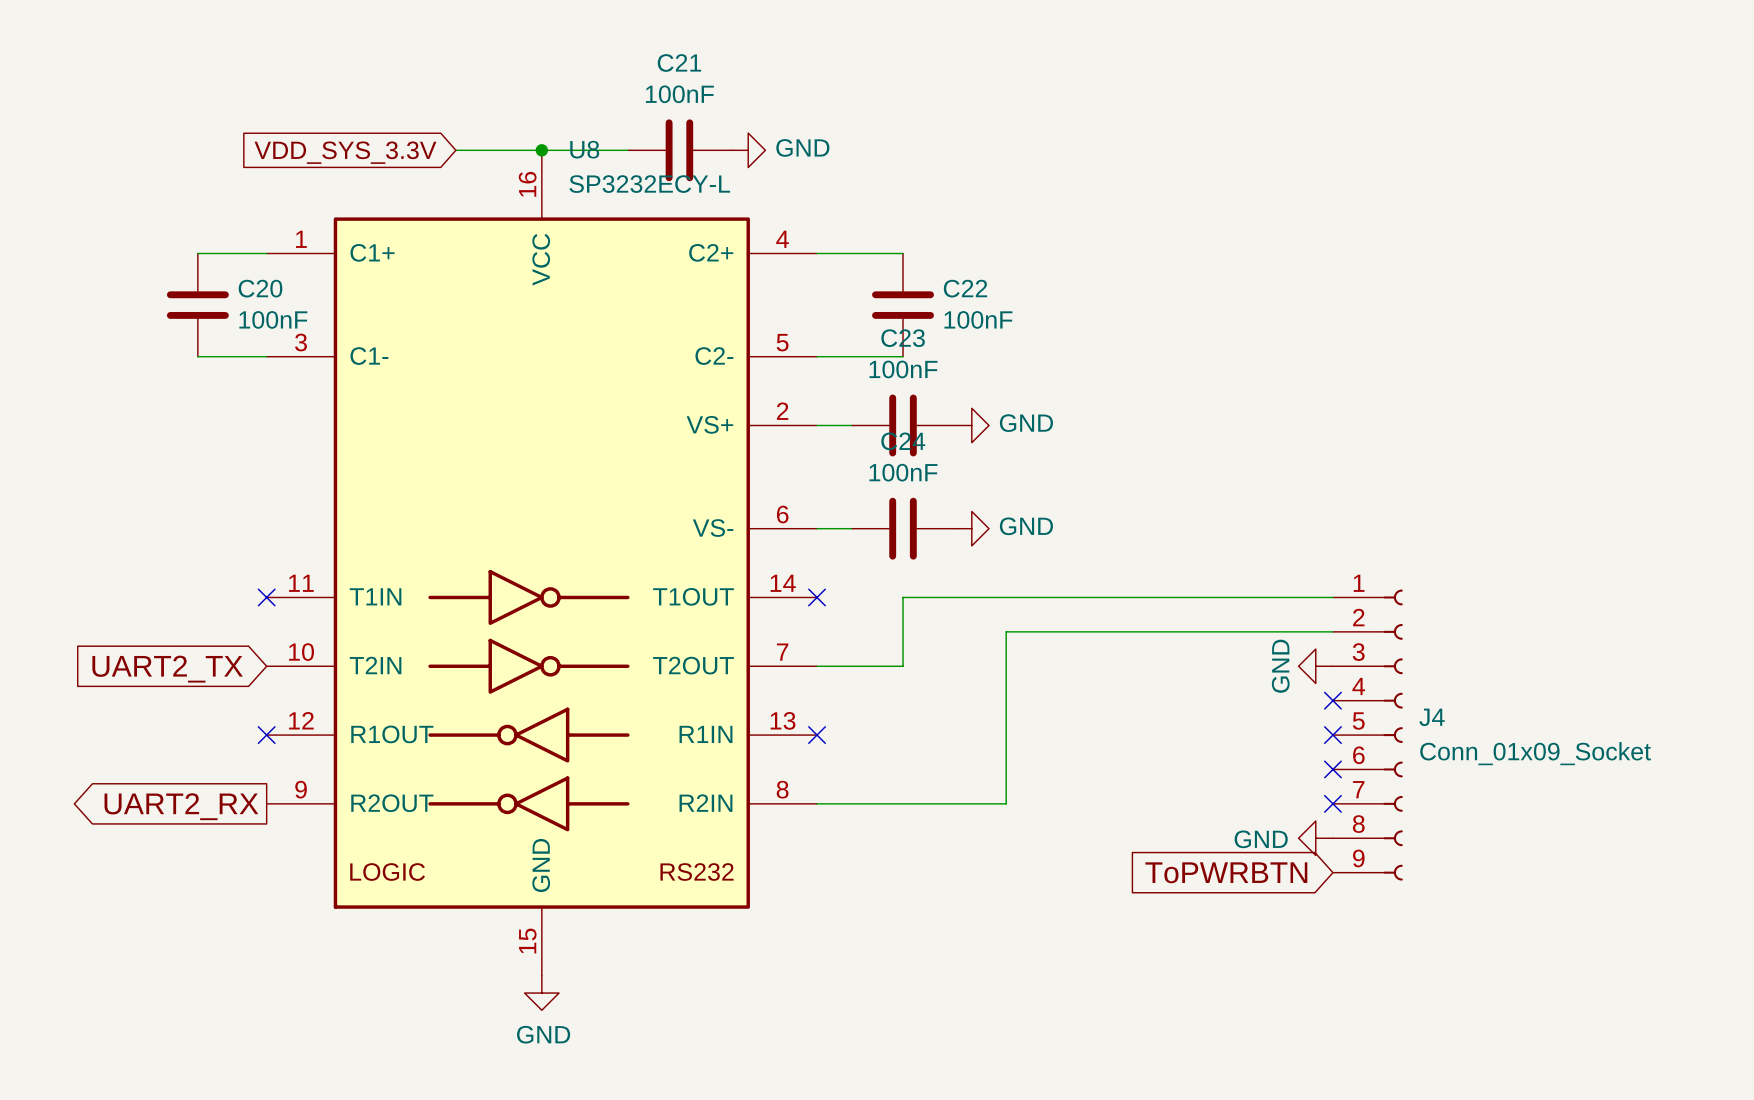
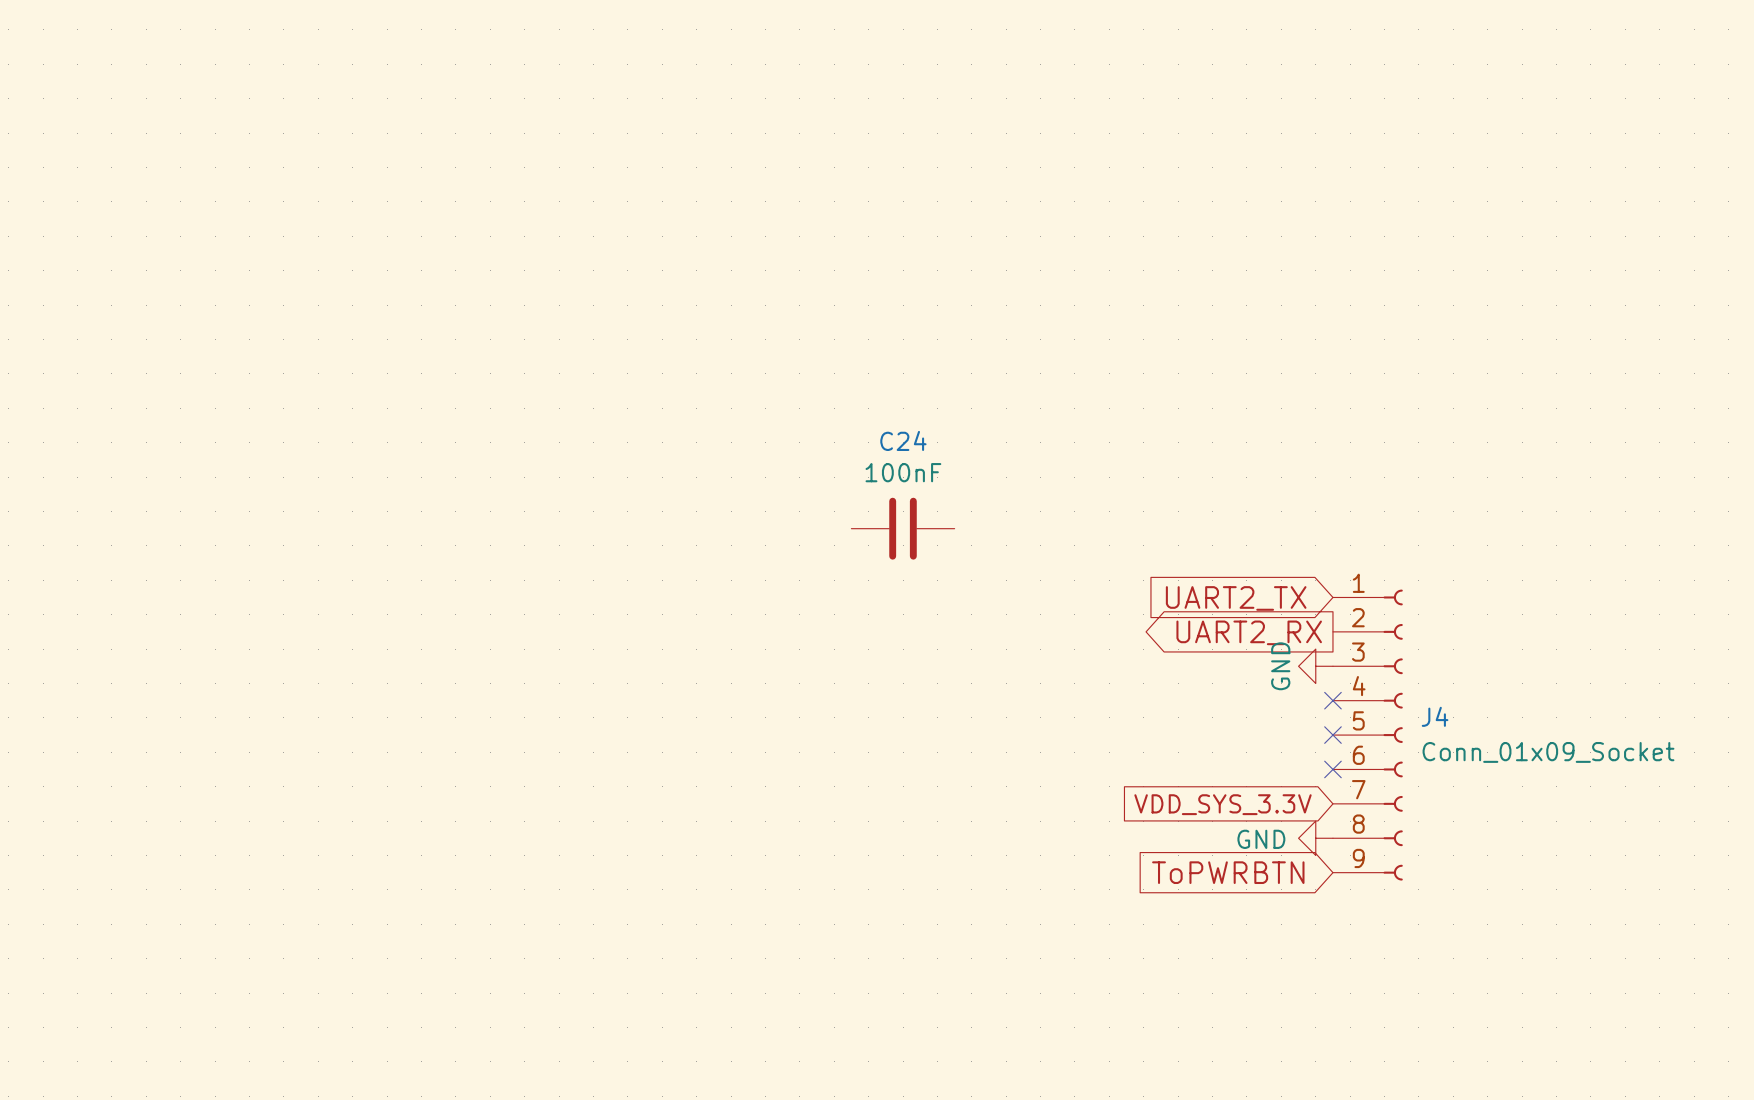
wire: (455, 150) (627, 150) -> none
junction: (541, 150) -> none
C21: 100nF (679, 150) -> none
power symbol: GND (748, 150) -> none
global label: VDD_SYS_3.3V (345, 152) -> none
wire: (197, 253) (266, 253) -> none
wire: (817, 253) (903, 253) -> none
C20: 100nF (197, 305) -> none
C22: 100nF (903, 305) -> none
wire: (197, 356) (266, 356) -> none
wire: (817, 356) (903, 356) -> none
wire: (817, 425) (851, 425) -> none
C23: 100nF (903, 425) -> none
power symbol: GND (971, 425) -> none
wire: (817, 528) (851, 528) -> none
power symbol: GND (971, 528) -> none
U8: SP3232ECY-L (541, 563) -> none
no-connect mark: (266, 597) -> none
no-connect mark: (817, 597) -> none
wire: (1332, 597) (903, 597) (903, 666) (817, 666) -> none
global label: none -> UART2_TX (1236, 598)
wire: (1332, 631) (1006, 631) (1006, 803) (817, 803) -> none
global label: none -> UART2_RX (1249, 632)
global label: UART2_TX (167, 669) -> none
no-connect mark: (266, 735) -> none
no-connect mark: (817, 735) -> none
no-connect mark: (1332, 803) -> none
global label: UART2_RX (181, 806) -> none
global label: none -> VDD_SYS_3.3V (1223, 804)
power symbol: GND (541, 993) -> none

